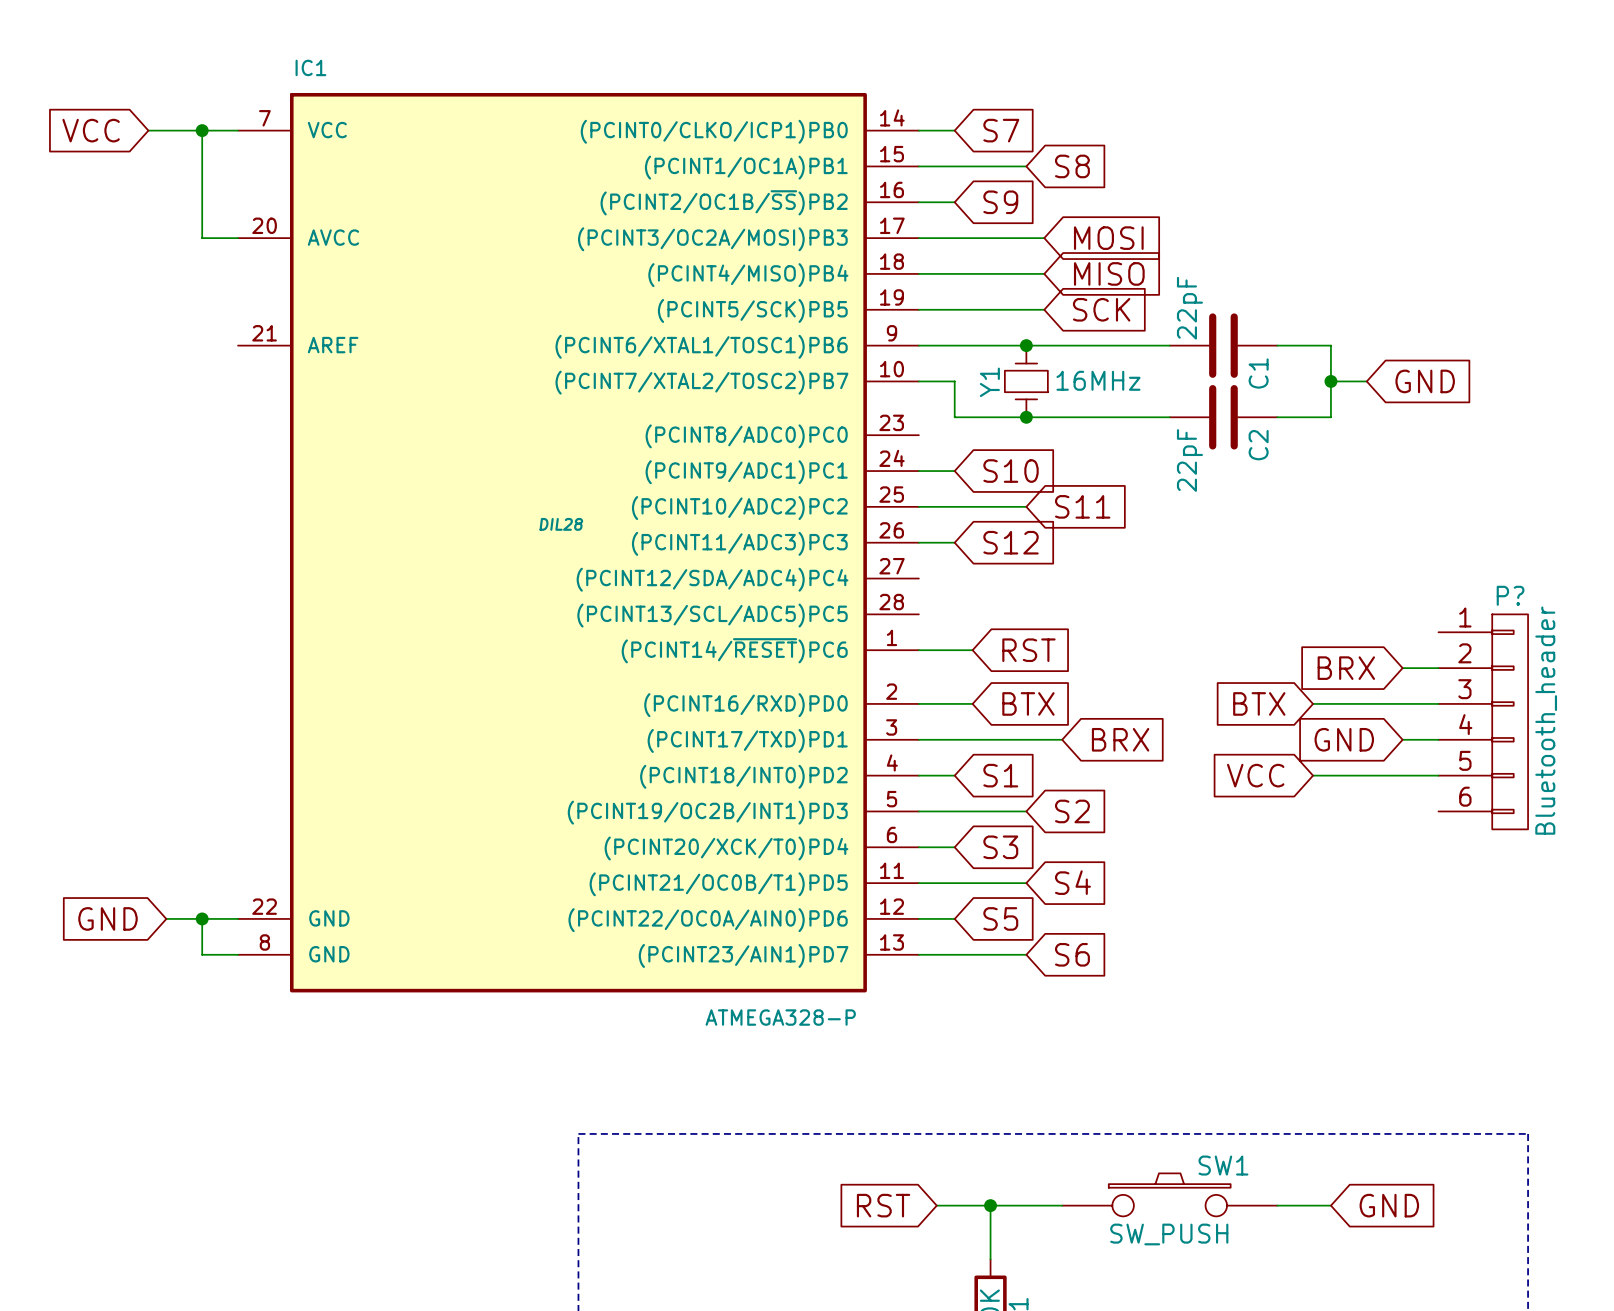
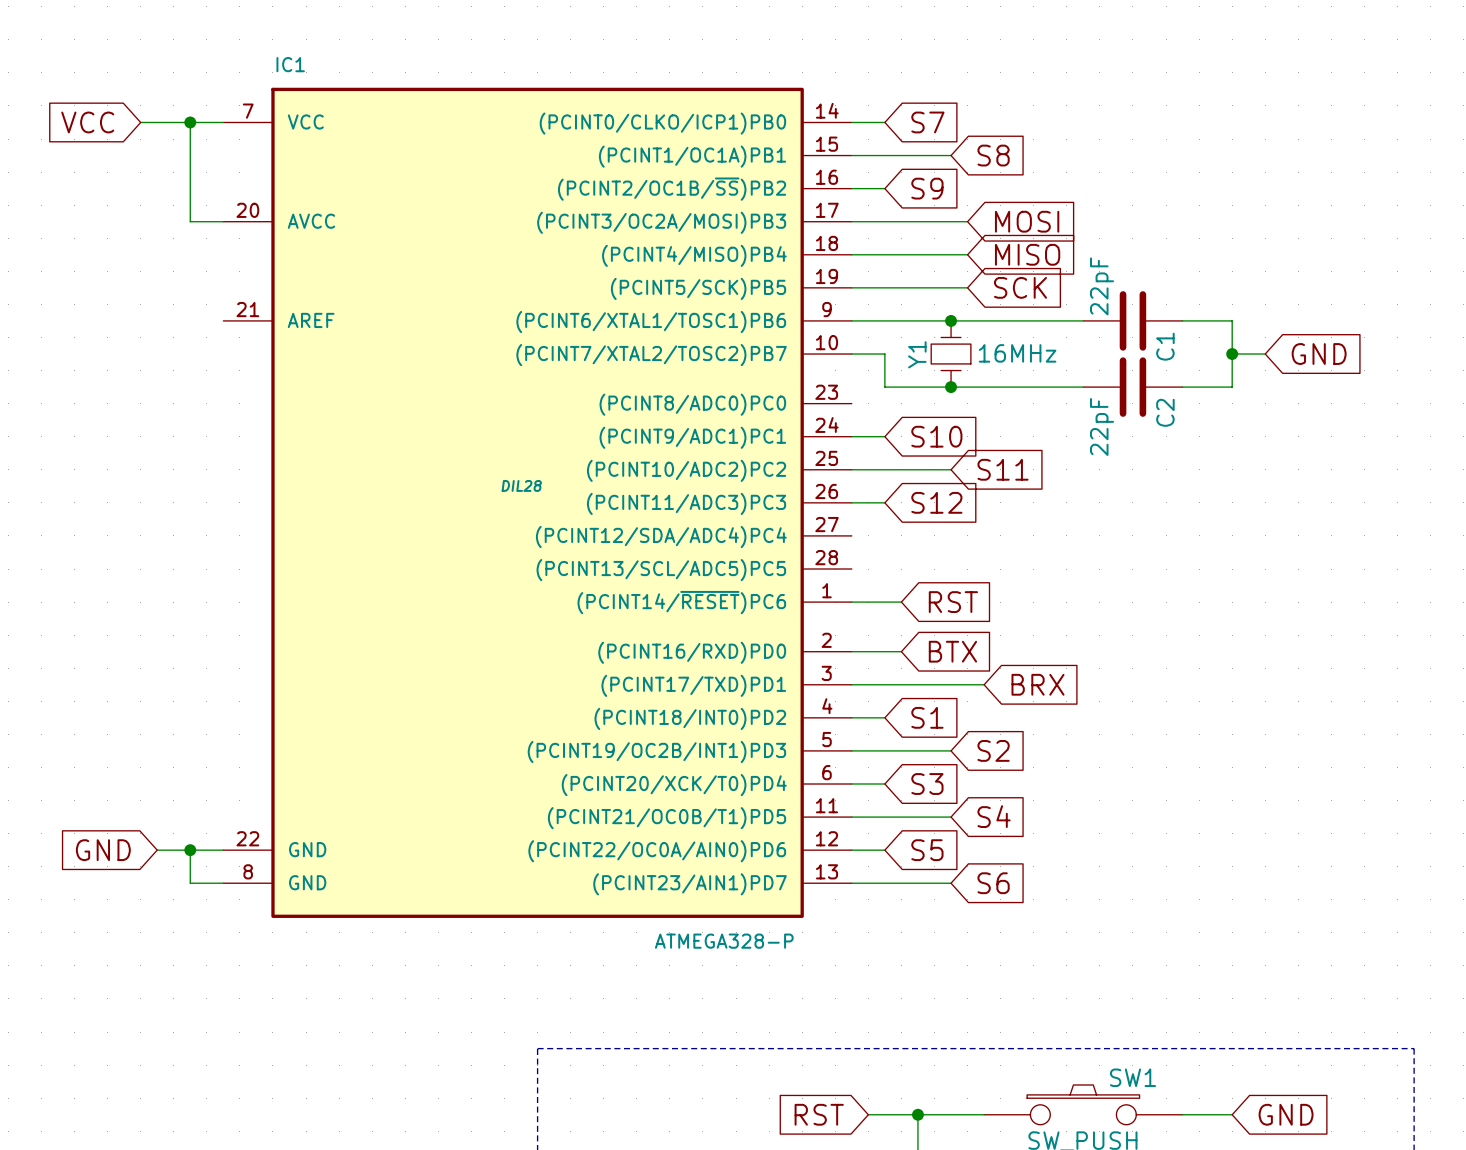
global label: BRX (1346, 668) -> none
wire: (1402, 668) (1438, 668) -> none
global label: BTX (1259, 703) -> none
wire: (1313, 703) (1438, 703) -> none
P?: Bluetooth_header (1483, 721) -> none
global label: GND (1344, 739) -> none
wire: (1402, 739) (1438, 739) -> none
global label: VCC (1255, 775) -> none
wire: (1313, 775) (1438, 775) -> none

